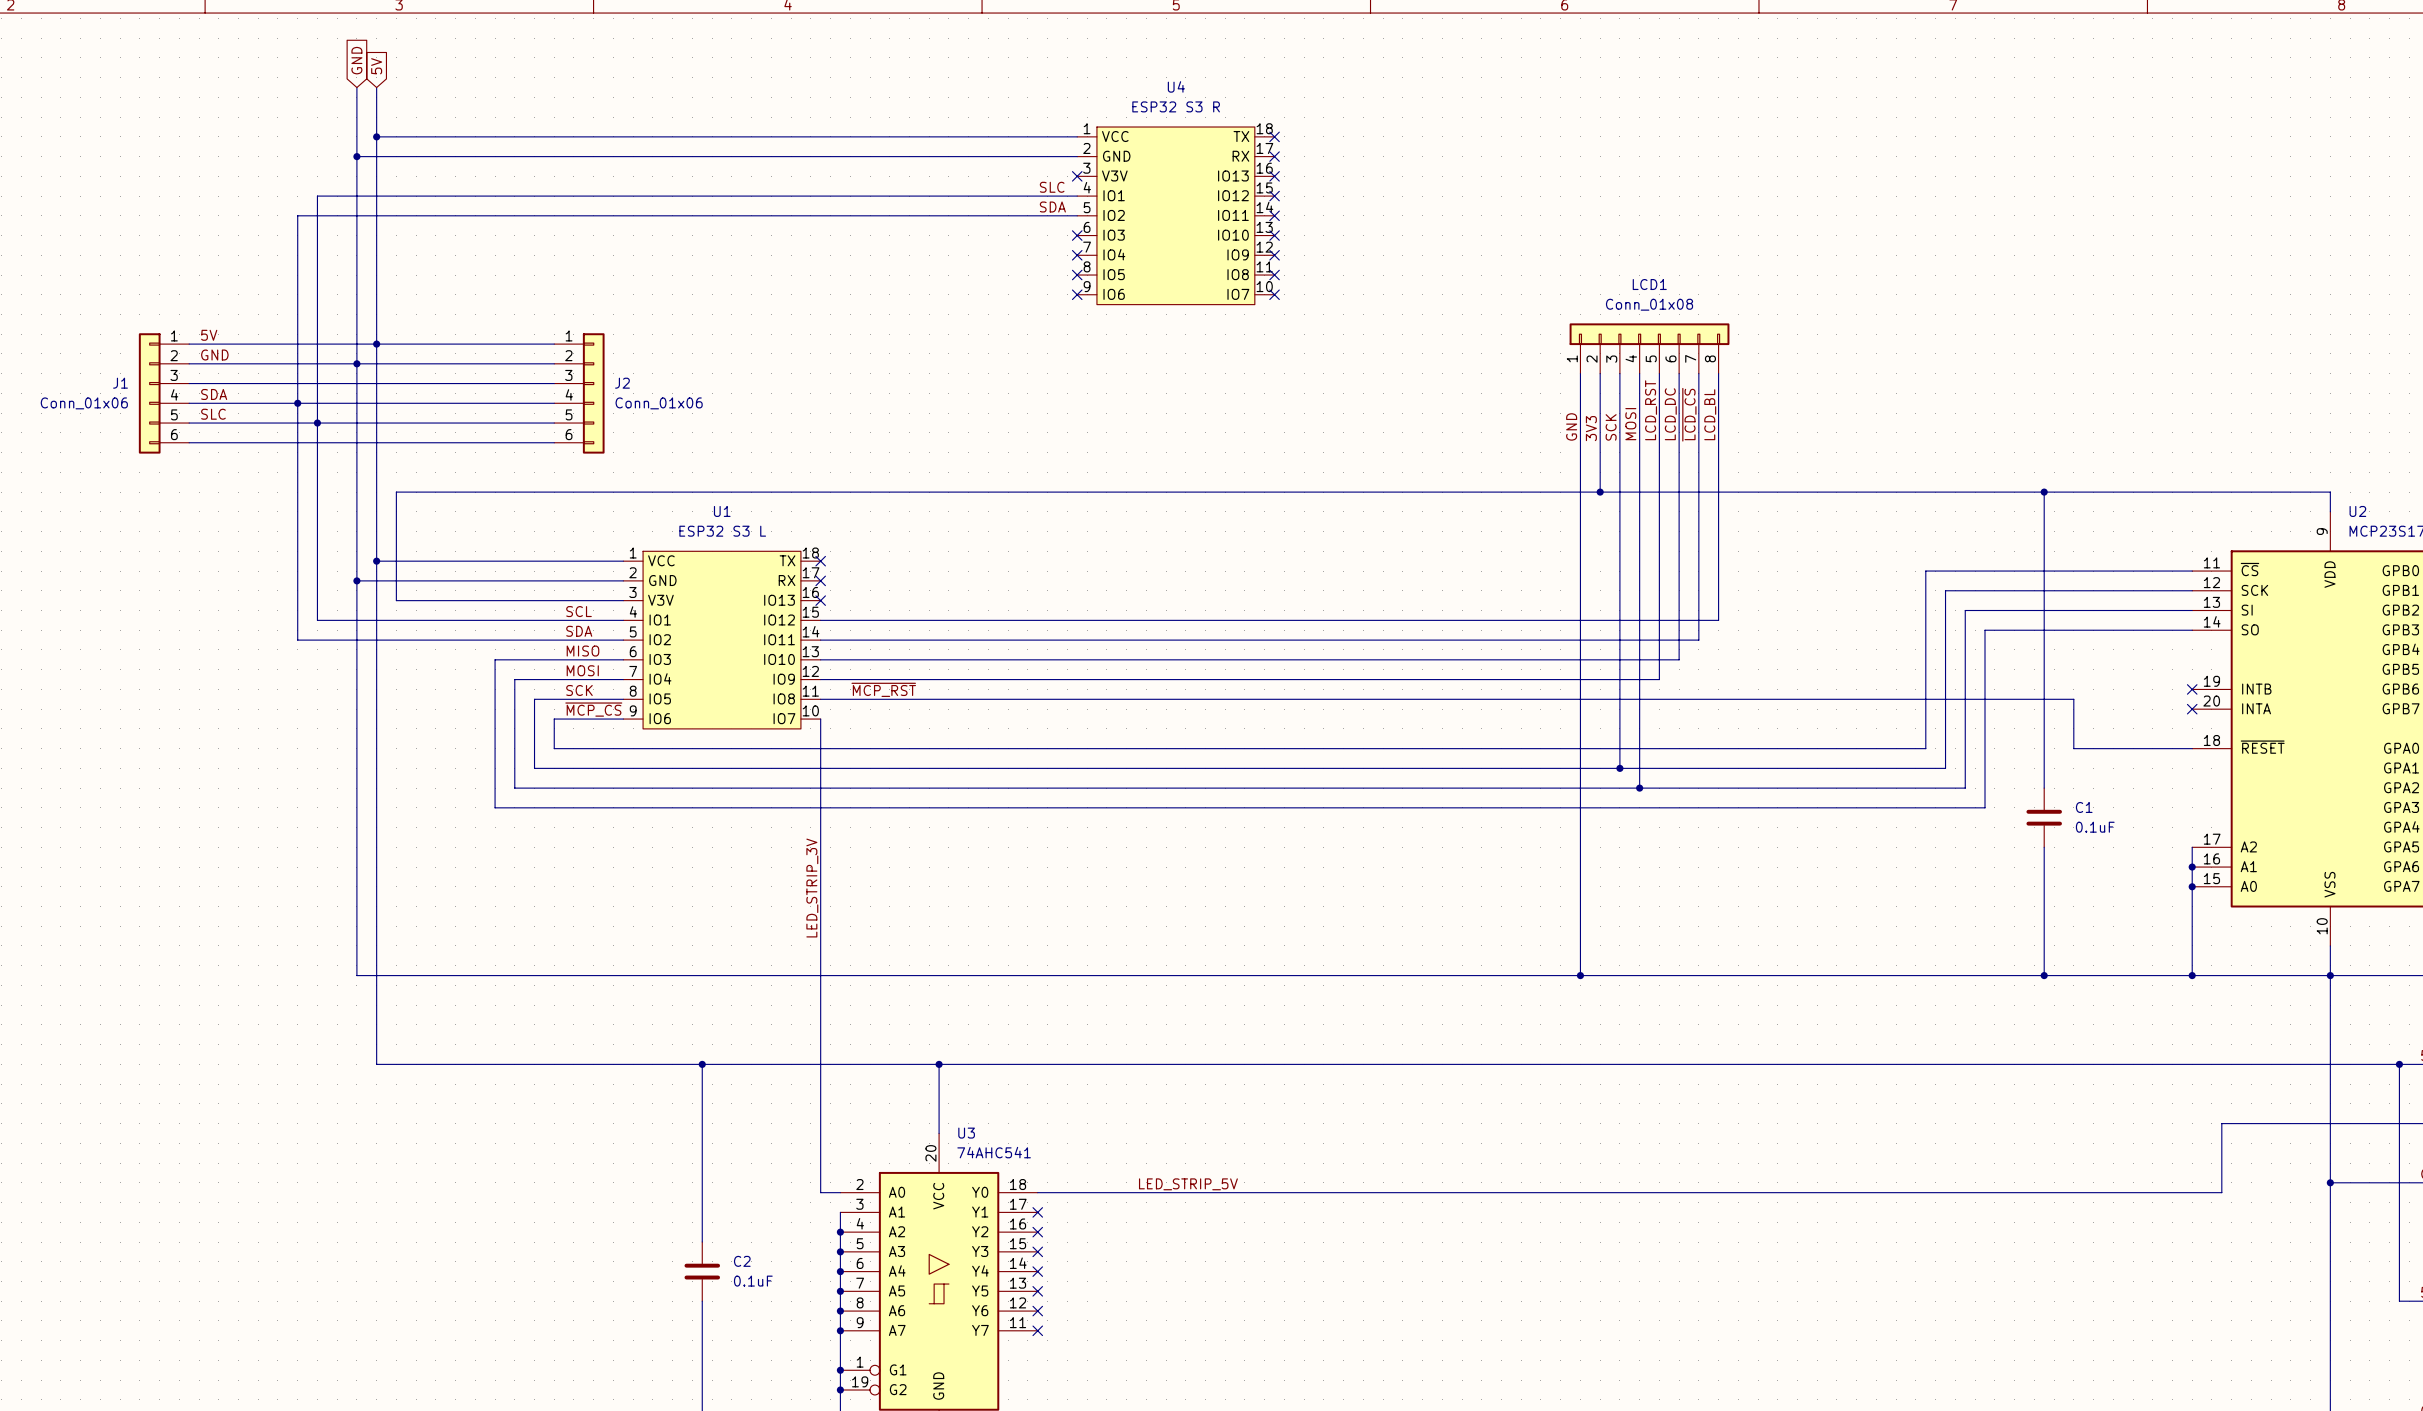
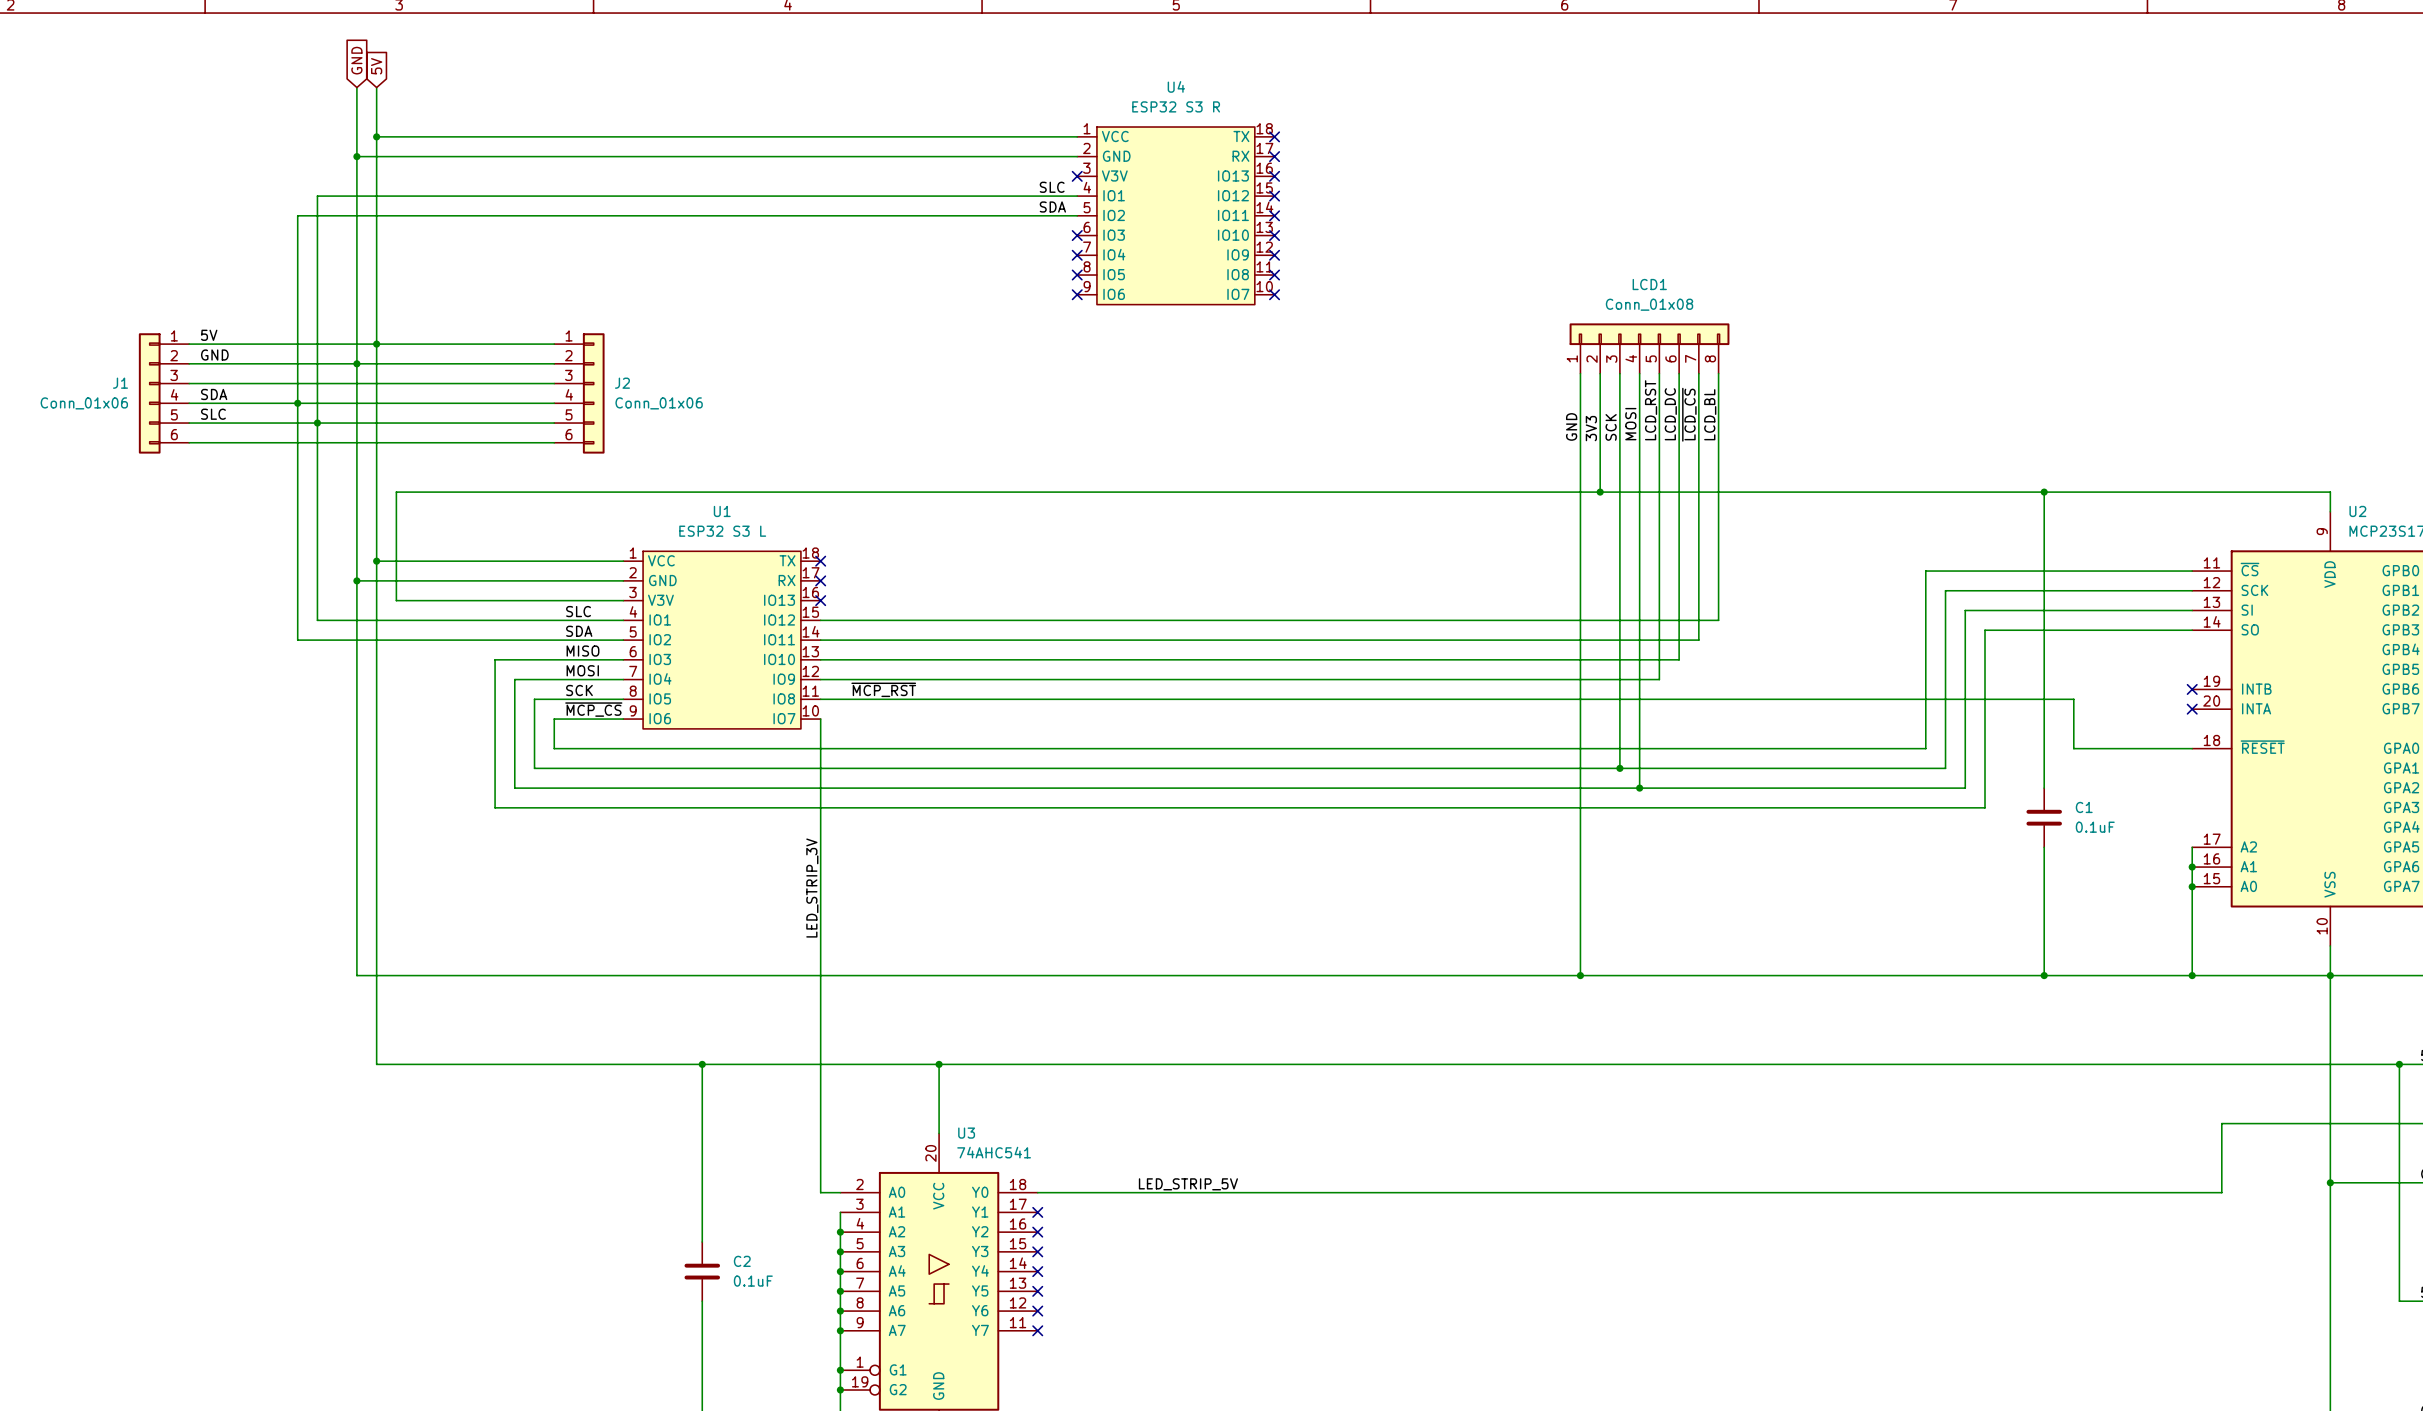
label: SCL (579, 611) -> SLC (578, 611)

